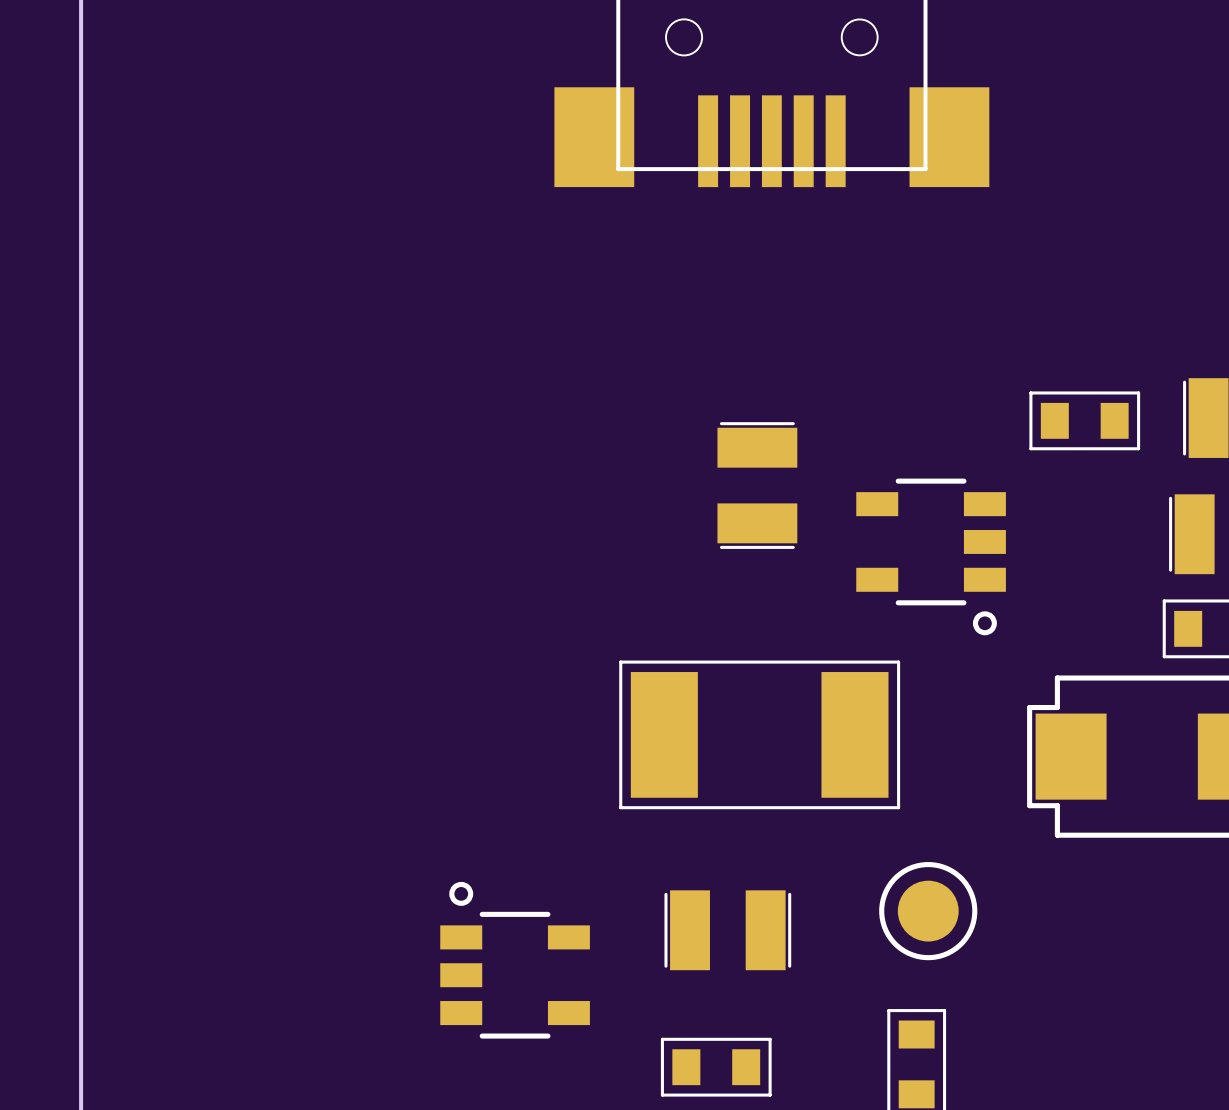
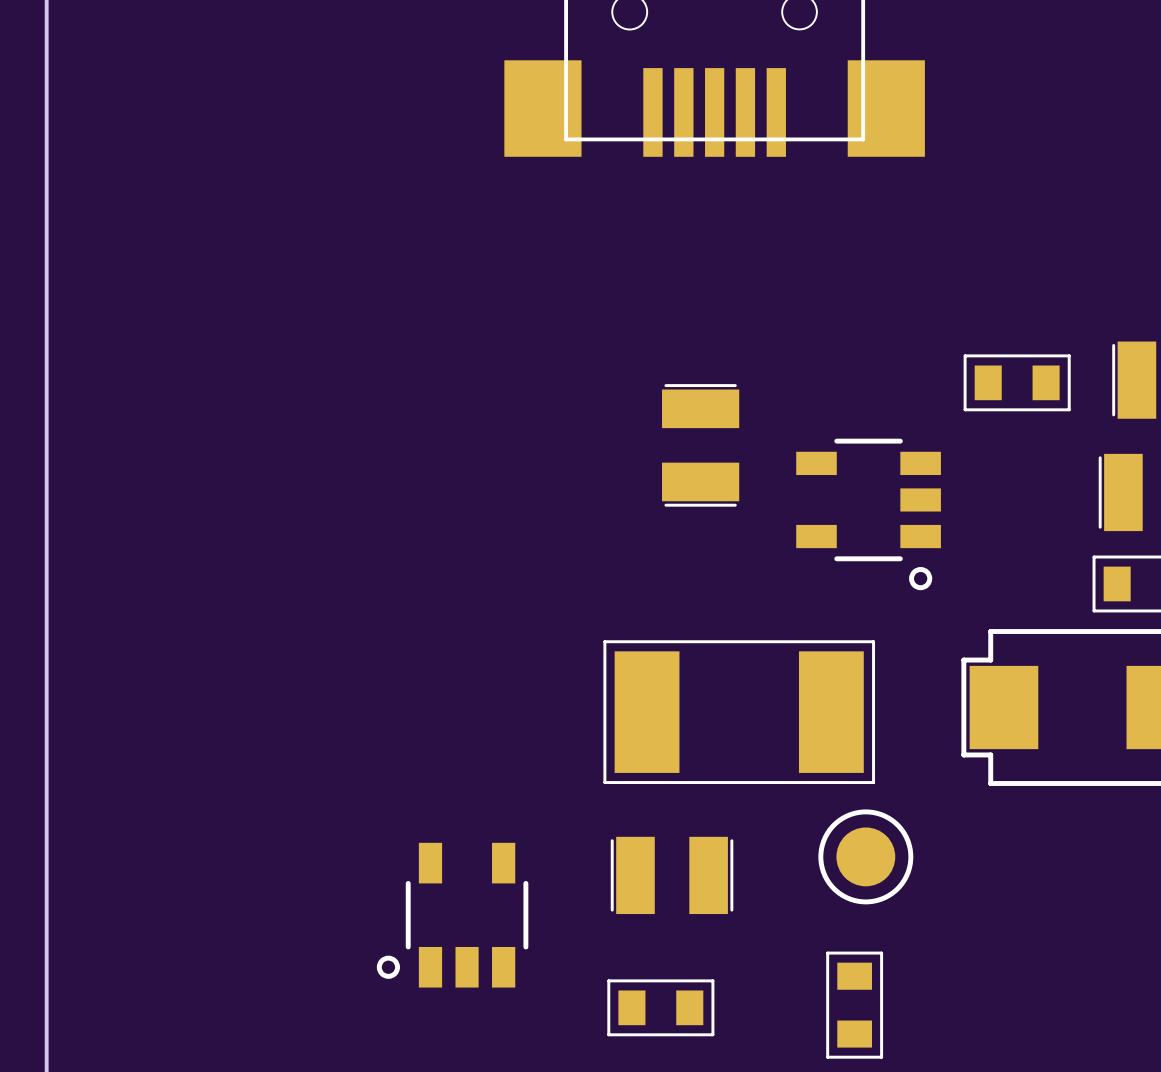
part position: (759, 734) -> (739, 712)
part rotation: 0° (515, 960) -> 90° counterclockwise (452, 915)

